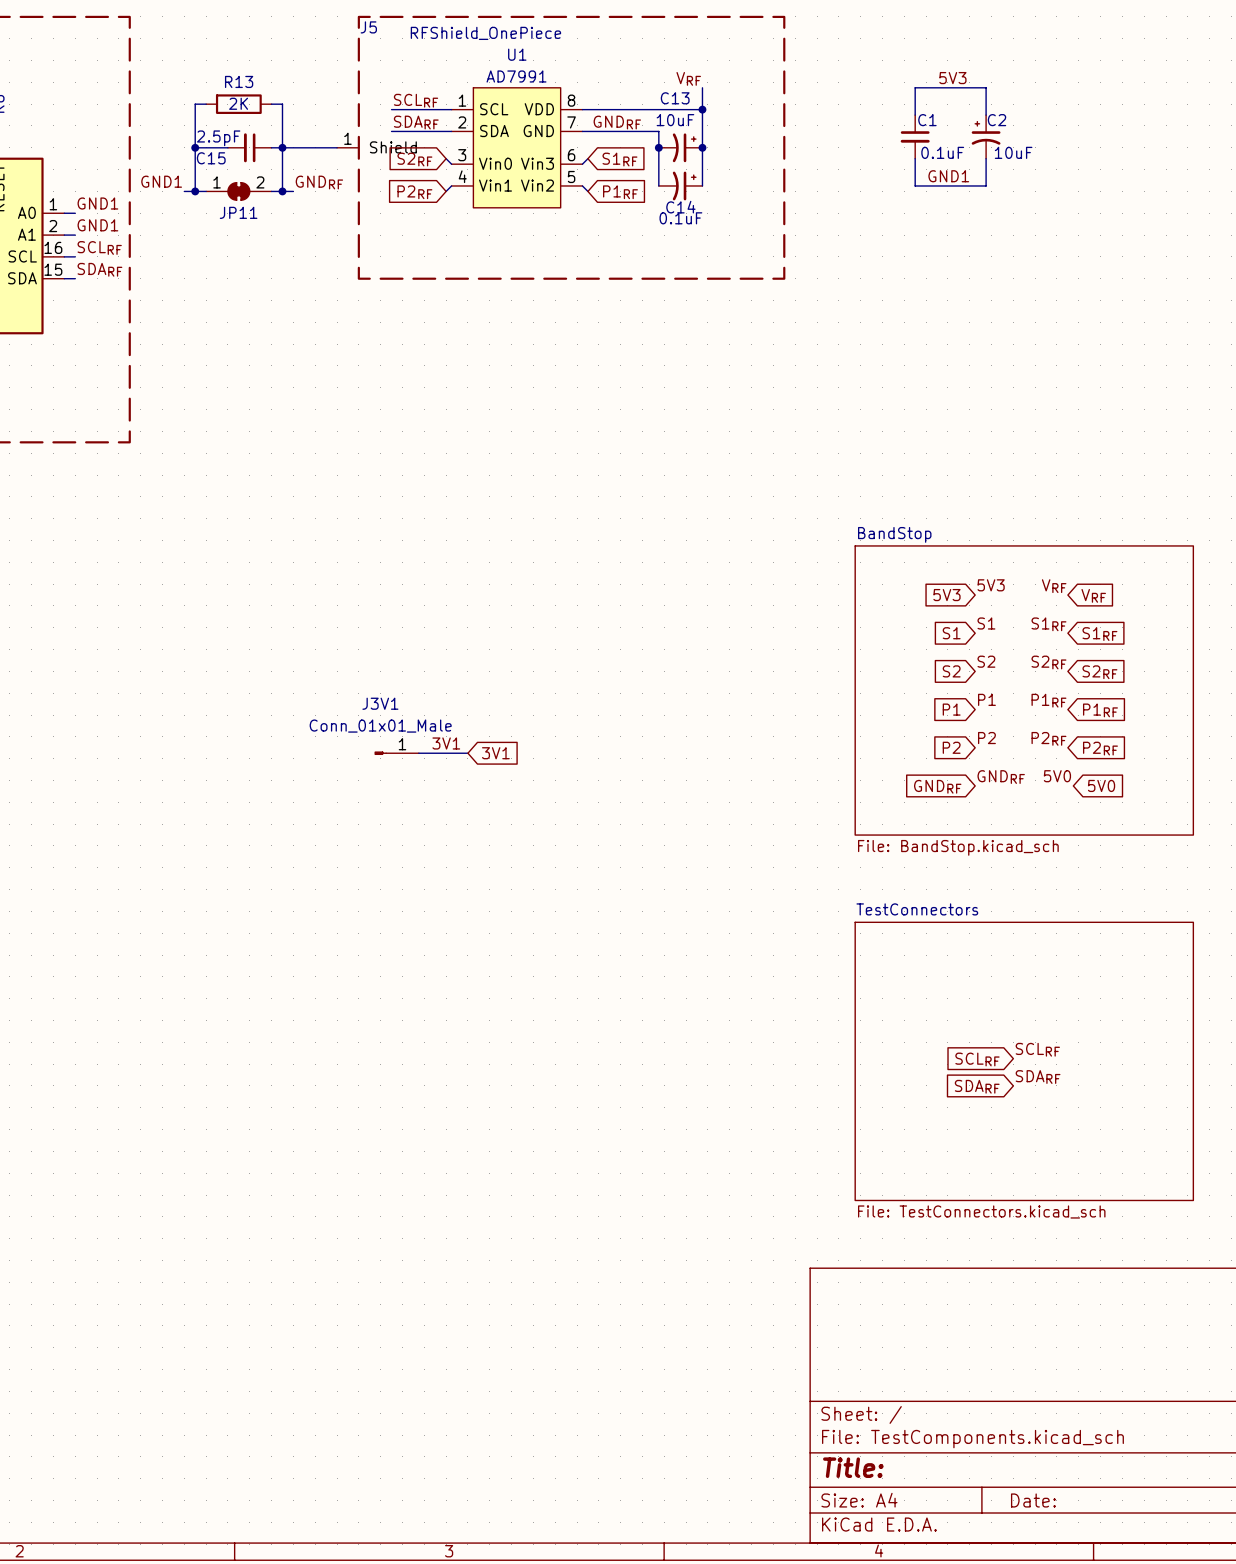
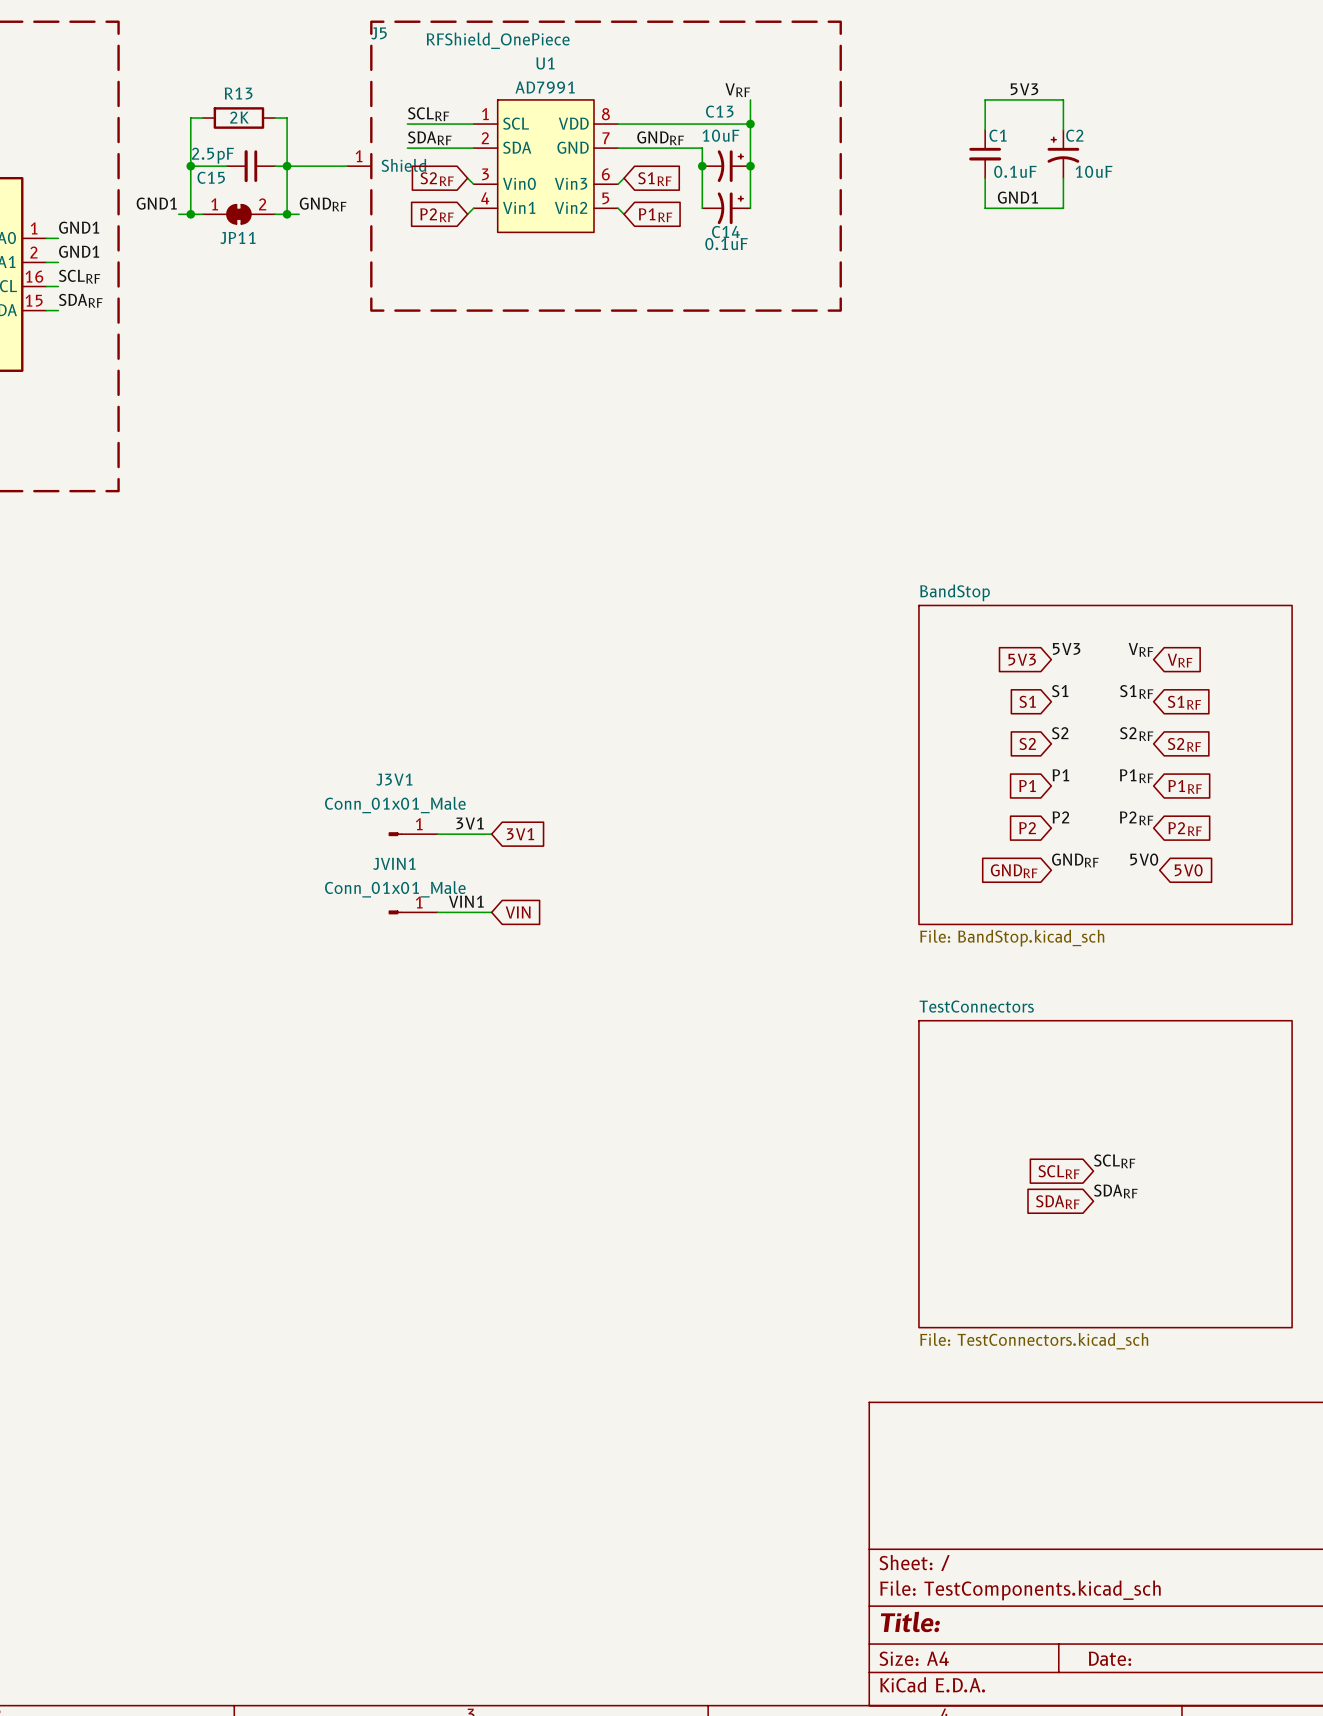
label: none -> VIN1 (466, 901)
JVIN1: none -> Conn_01x01_Male (413, 912)
wire: none -> (437, 912) (491, 912)
global label: none -> VIN (518, 912)

